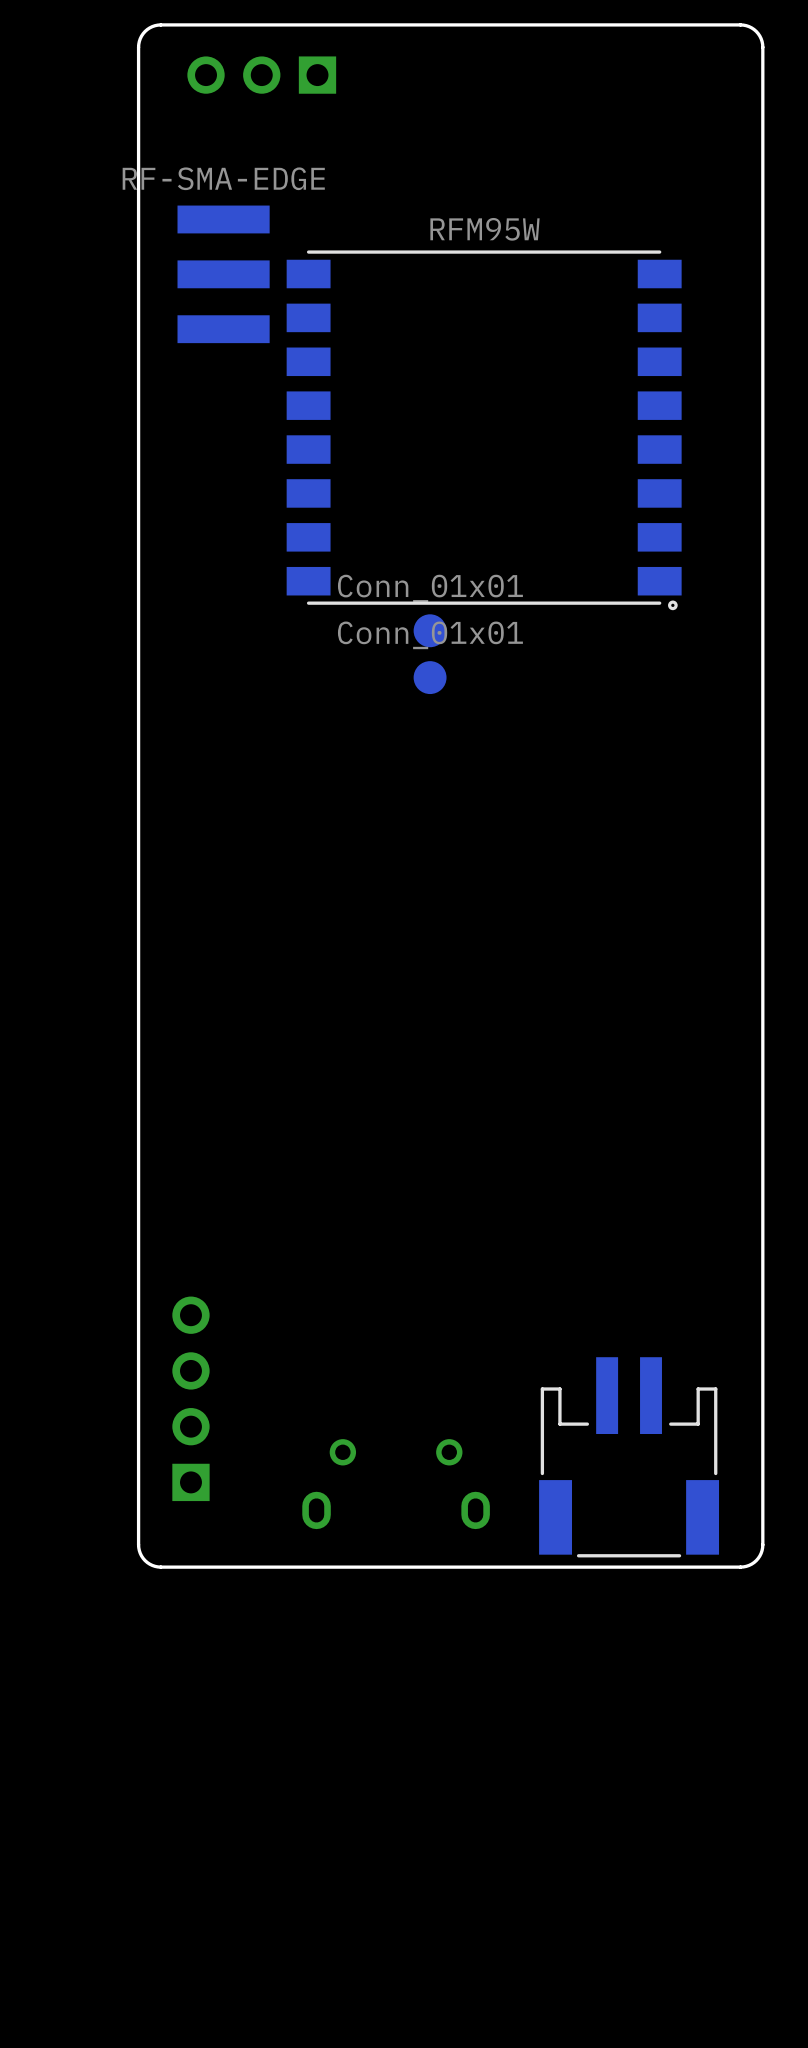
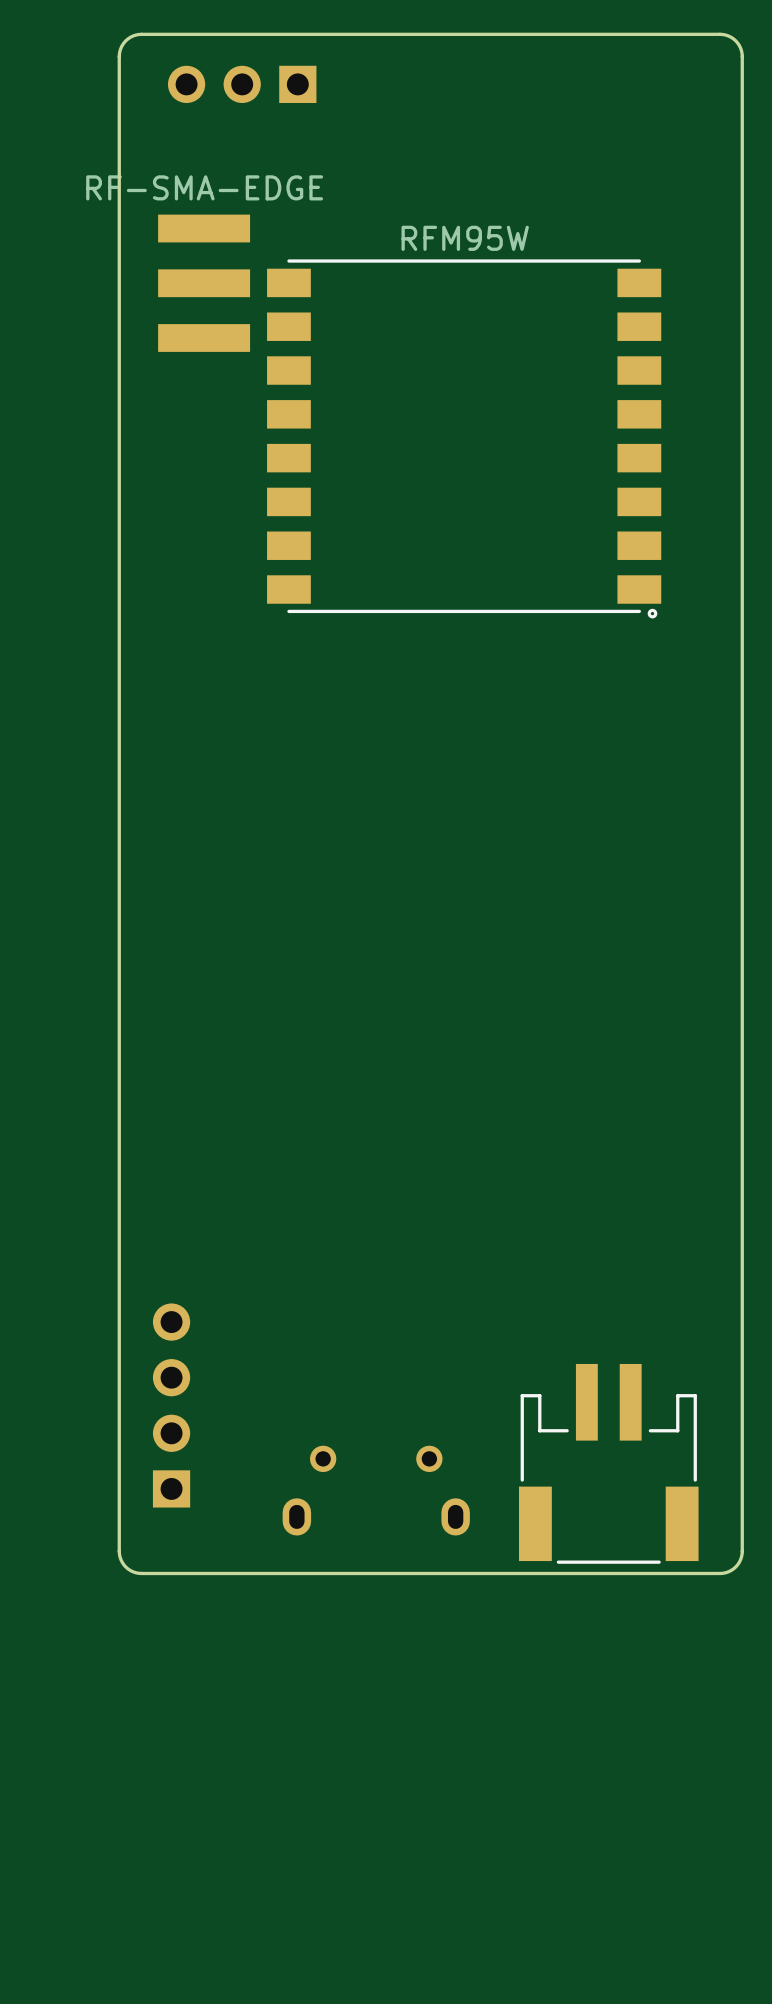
part: Conn_01x01 (430, 630) -> none
part: Conn_01x01 (430, 677) -> none

